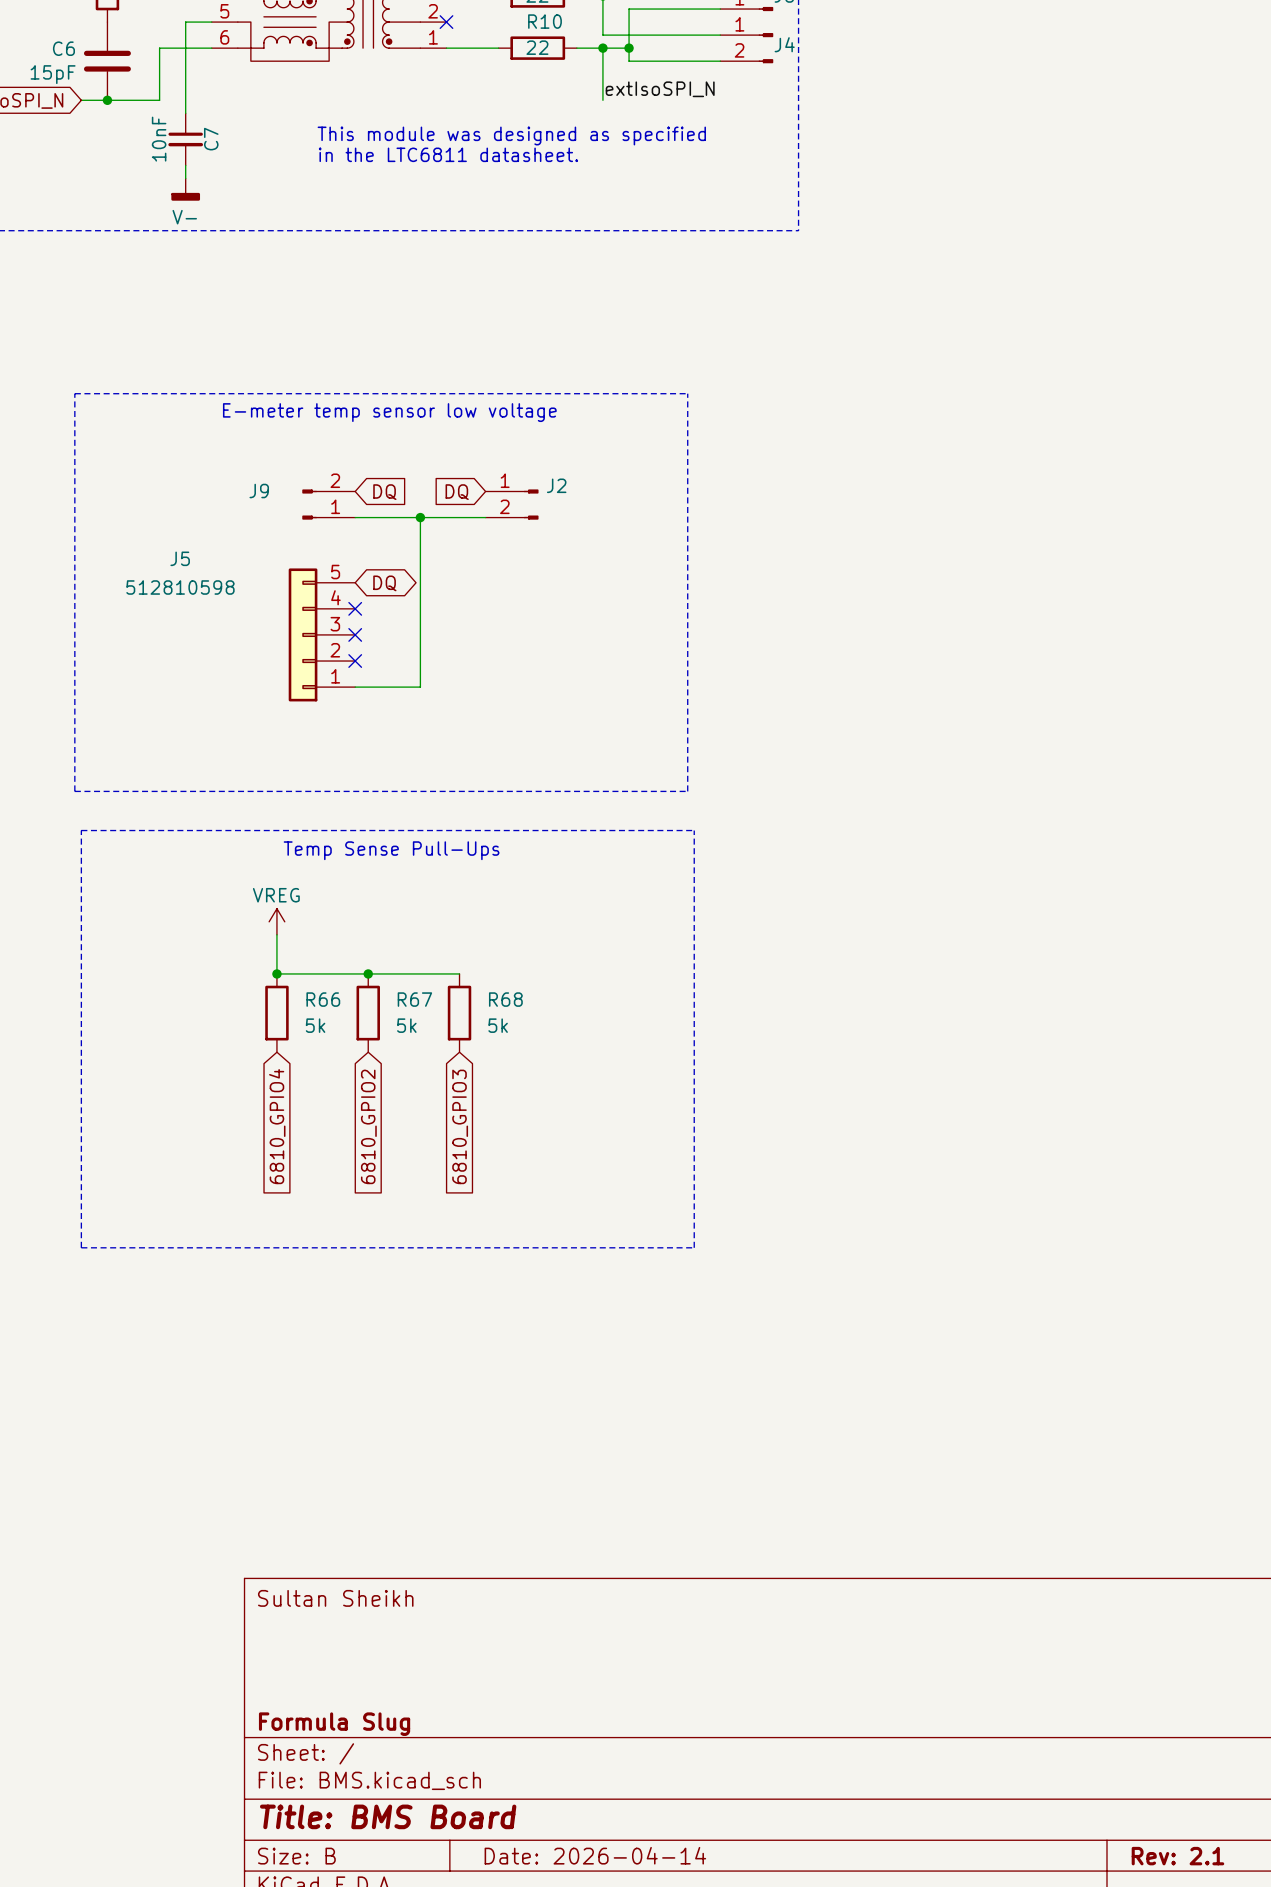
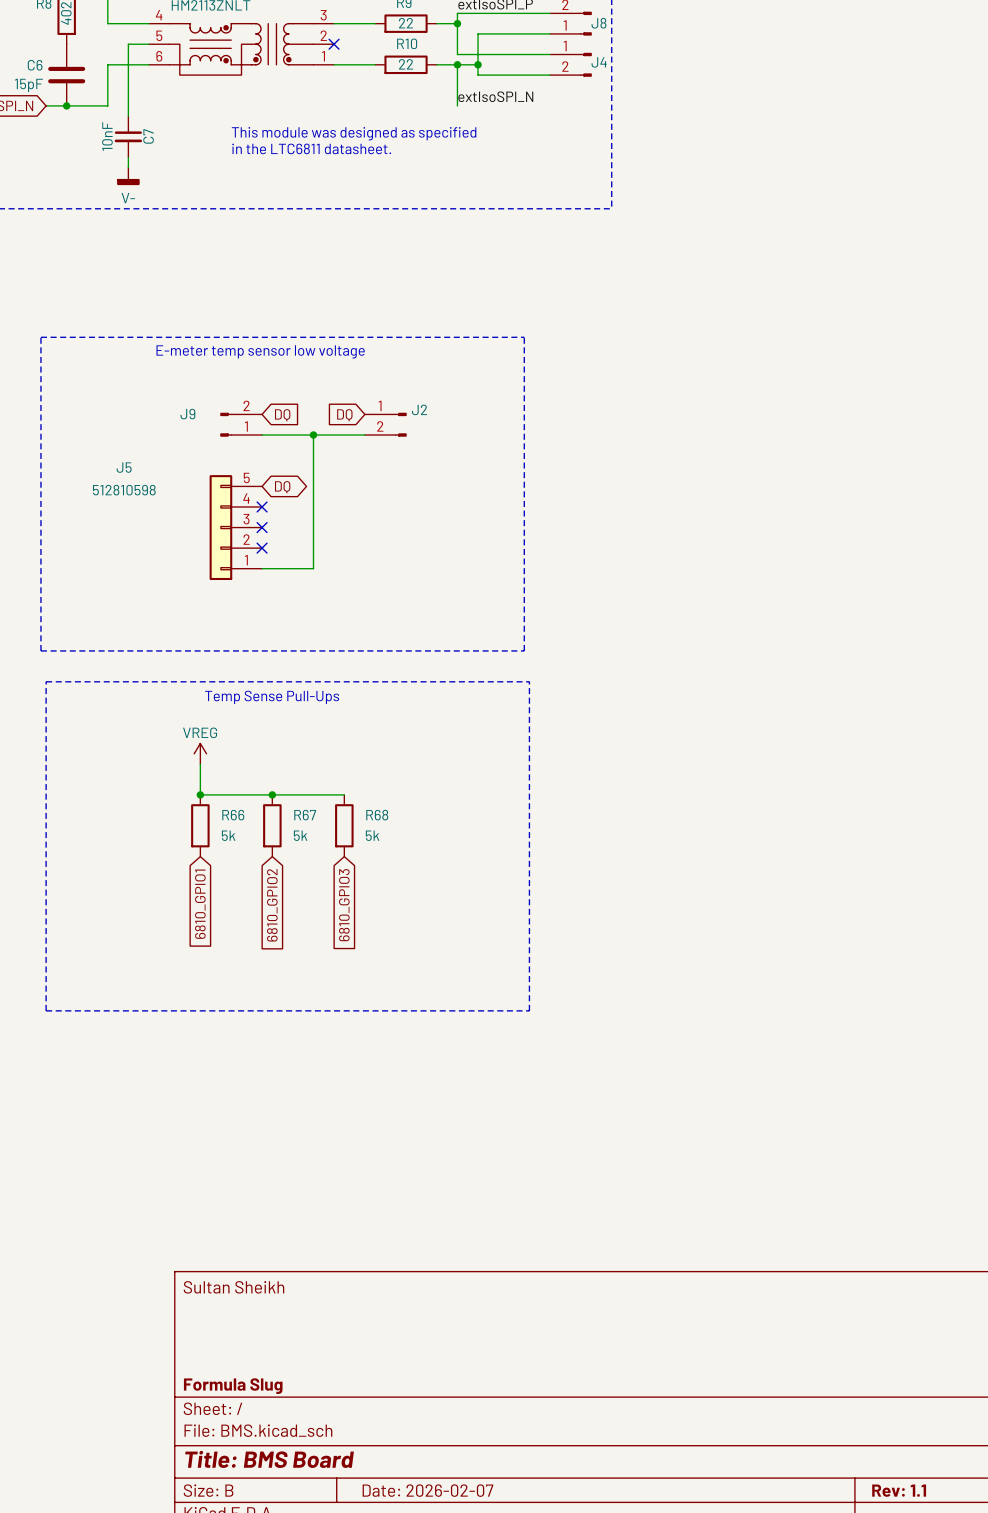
global label: 6810_GPIO4 (277, 1126) -> 6810_GPIO1 (200, 904)
title block: Date: 2026-04-14 (595, 1855) -> Date: 2026-02-07 (427, 1490)
title block: Rev: 2.1 (1177, 1856) -> Rev: 1.1 (899, 1490)

